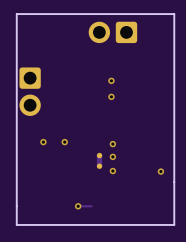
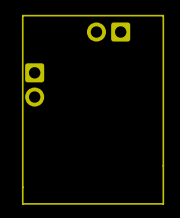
via: (111, 80) -> none
via: (111, 96) -> none
via: (43, 142) -> none
via: (64, 142) -> none
via: (112, 144) -> none
via: (112, 156) -> none
part: (99, 160) -> none
via: (112, 171) -> none
via: (160, 171) -> none
via: (78, 206) -> none
track: (91, 206) (78, 206) -> none

